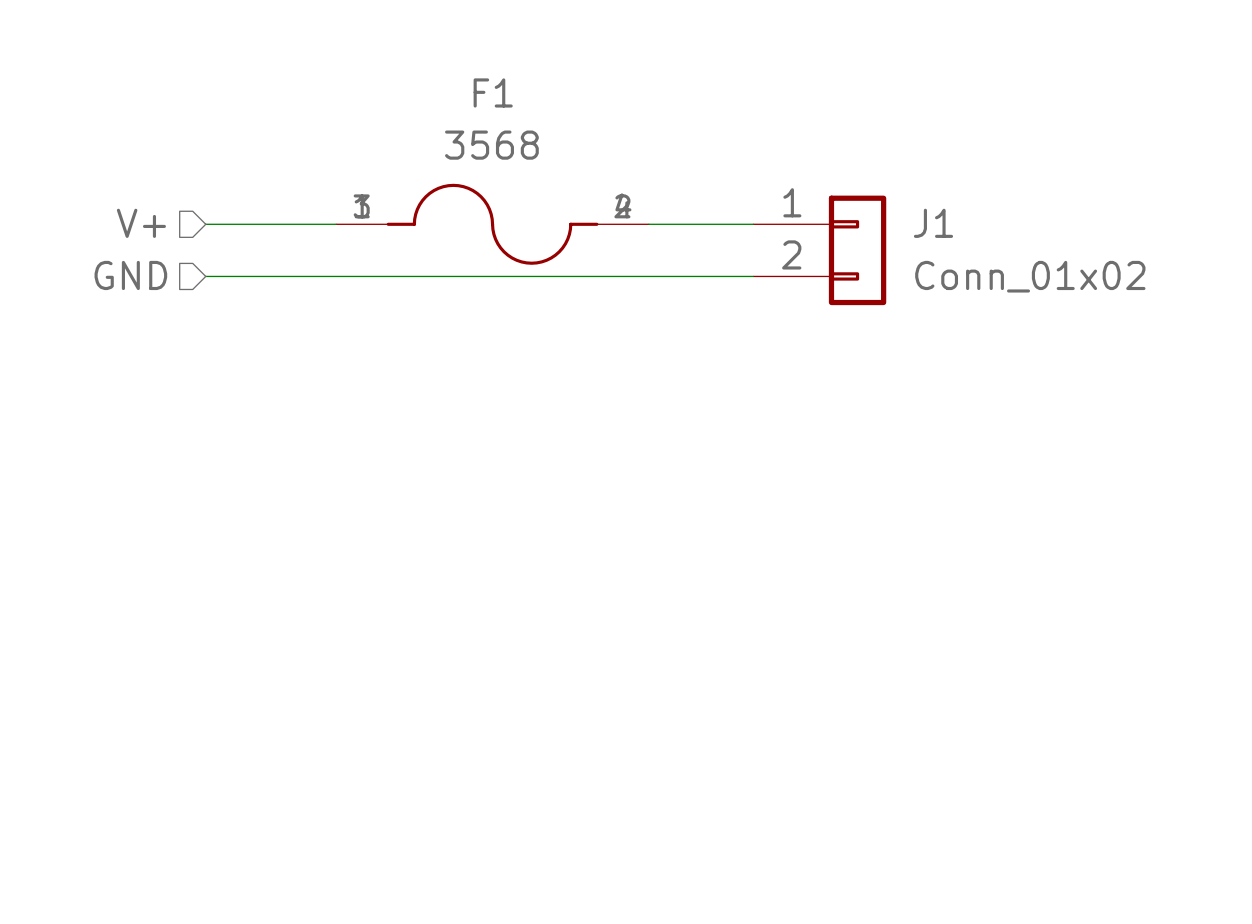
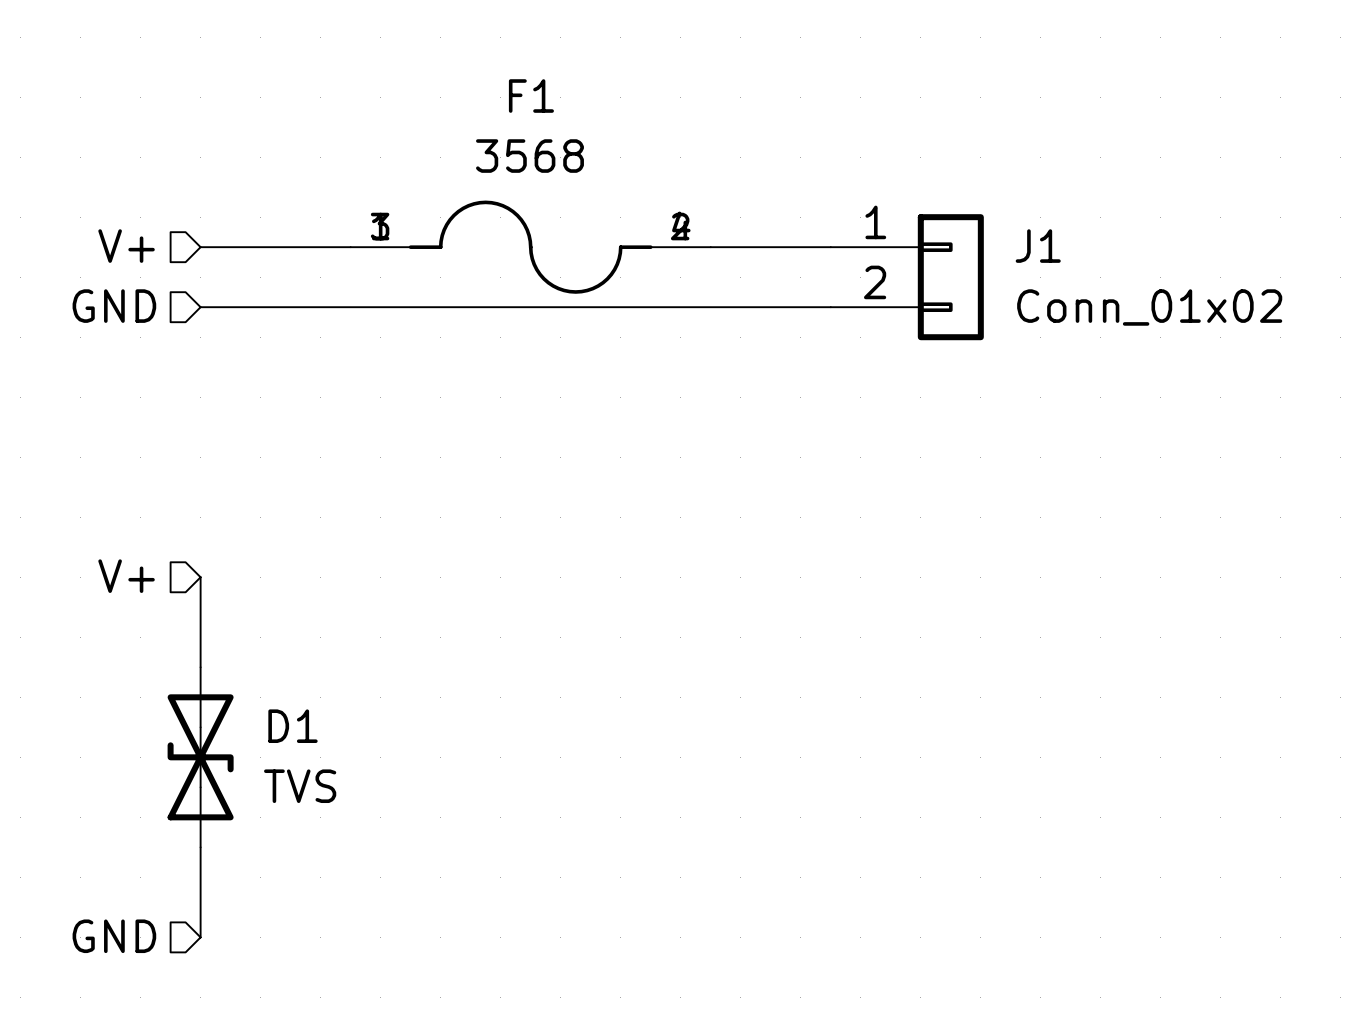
hierarchical label: none -> V+ (126, 576)
wire: none -> (200, 577) (200, 667)
D1: none -> TVS (200, 757)
wire: none -> (200, 847) (200, 937)
hierarchical label: none -> GND (114, 936)

